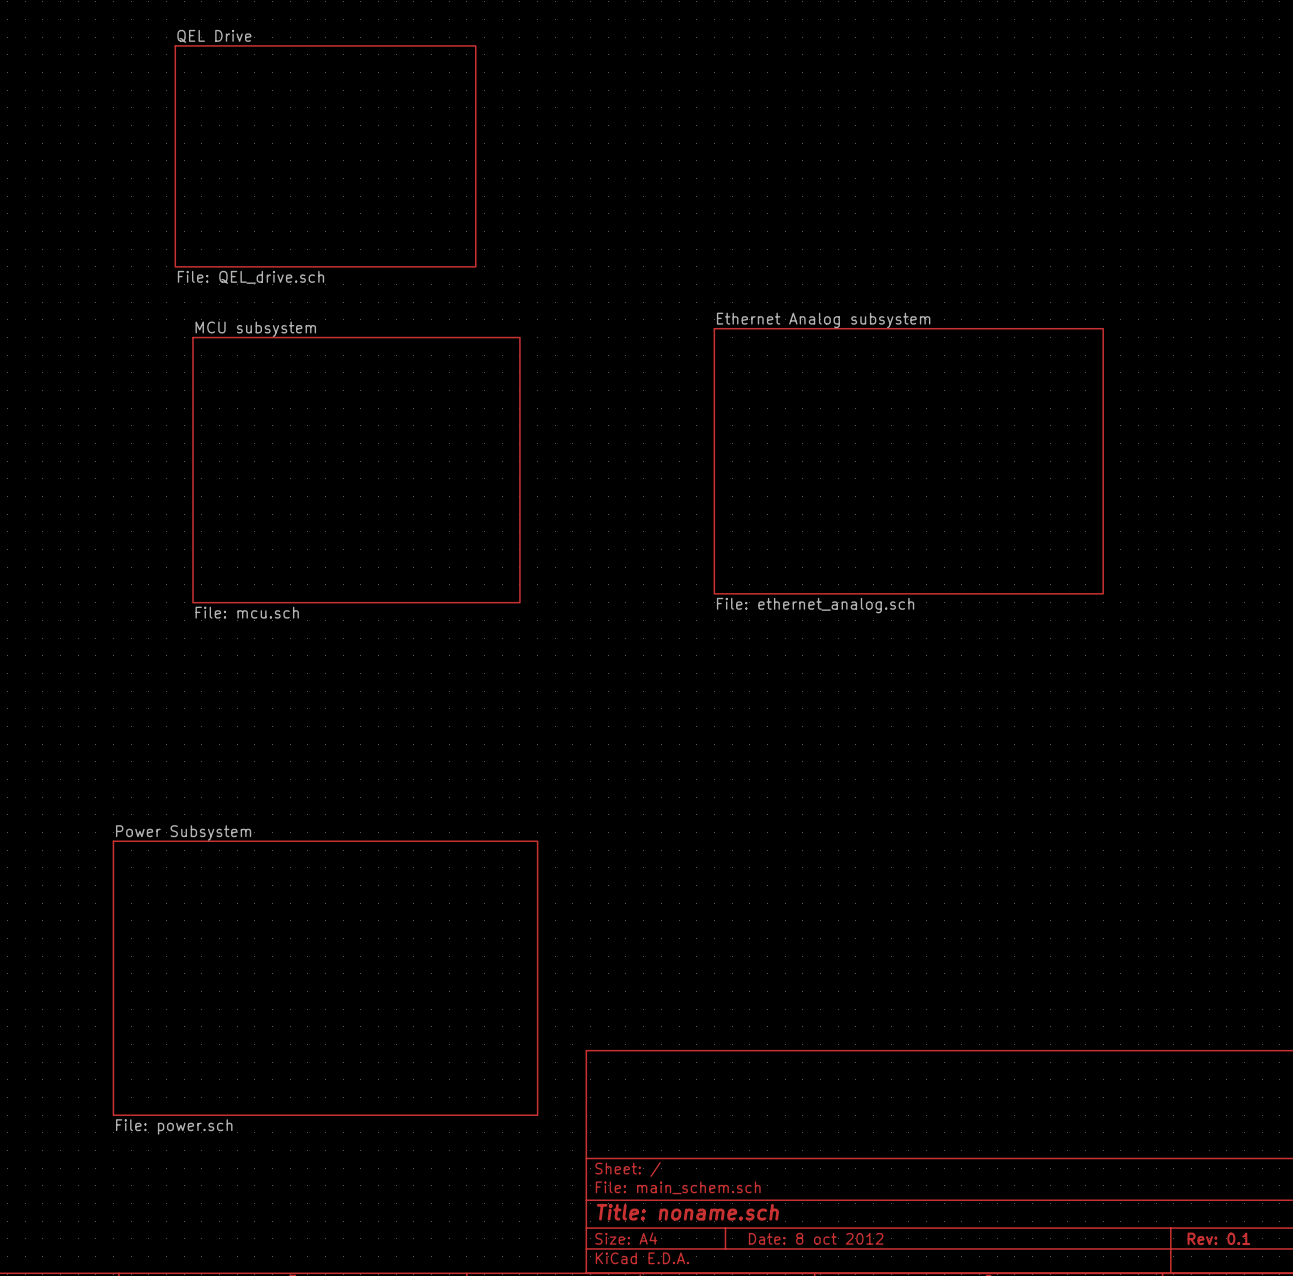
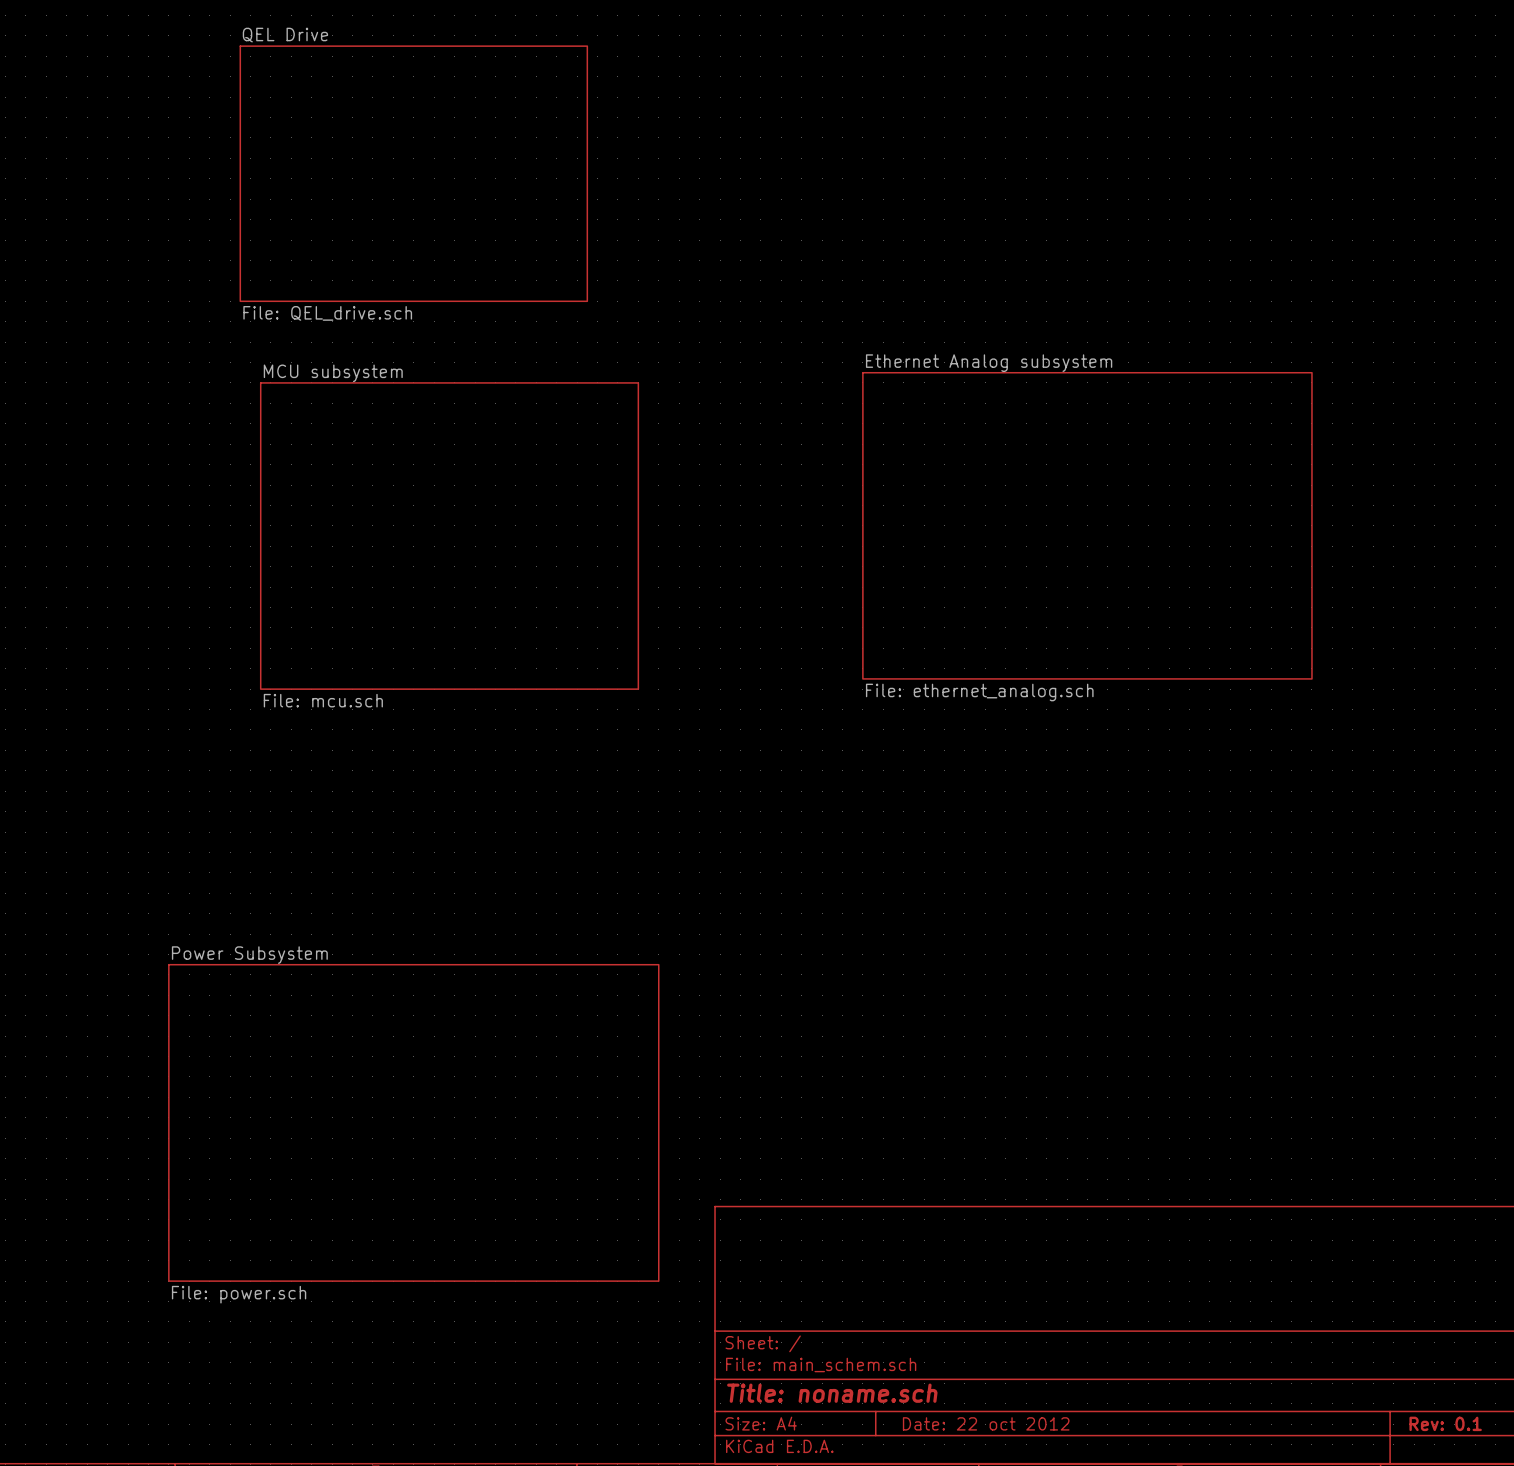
title block: Date: 8 oct 2012 (816, 1238) -> Date: 22 oct 2012 (986, 1423)

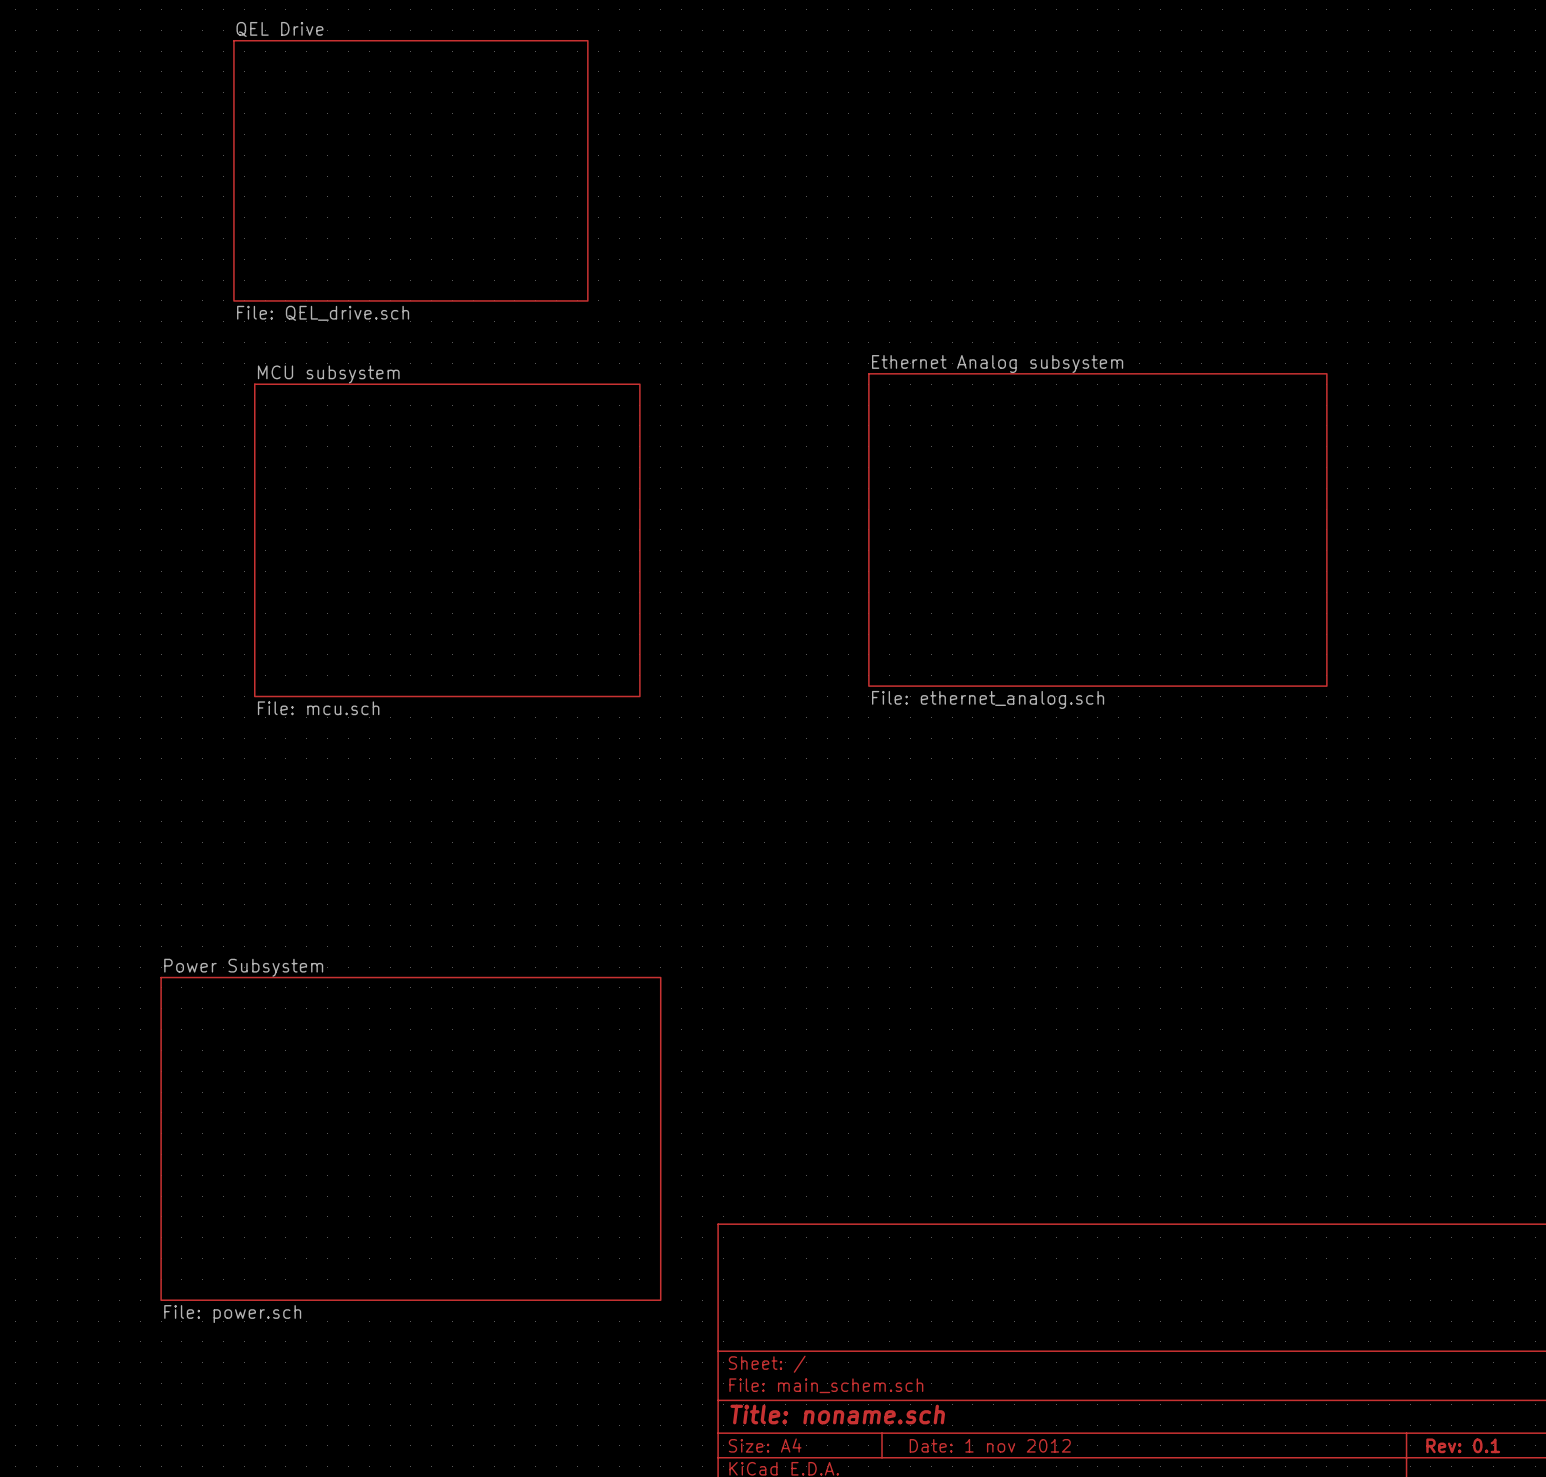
title block: Date: 22 oct 2012 (986, 1423) -> Date: 1 nov 2012 (990, 1445)

